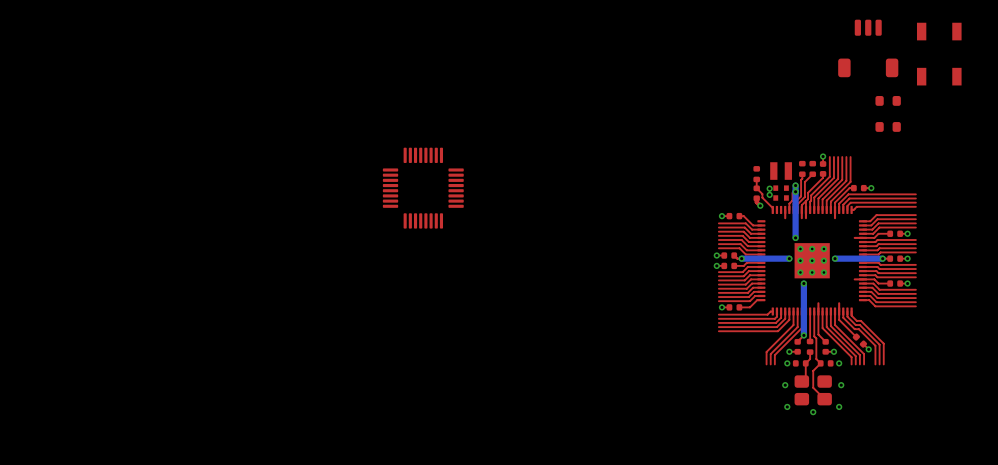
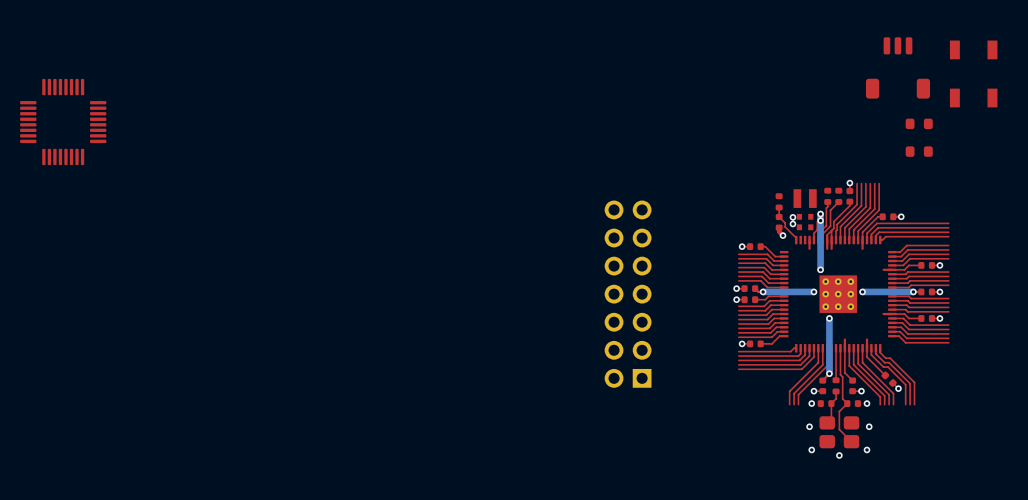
part: none -> (63, 122)
part: (423, 188) -> none
part: none -> (628, 294)

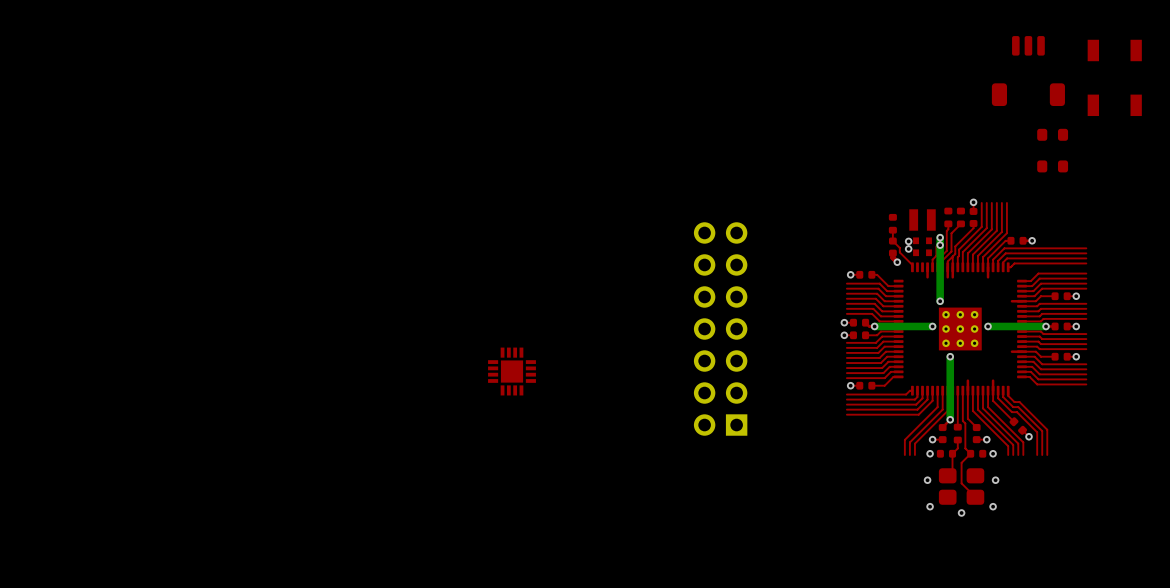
part: (63, 122) -> none
part: none -> (512, 371)

